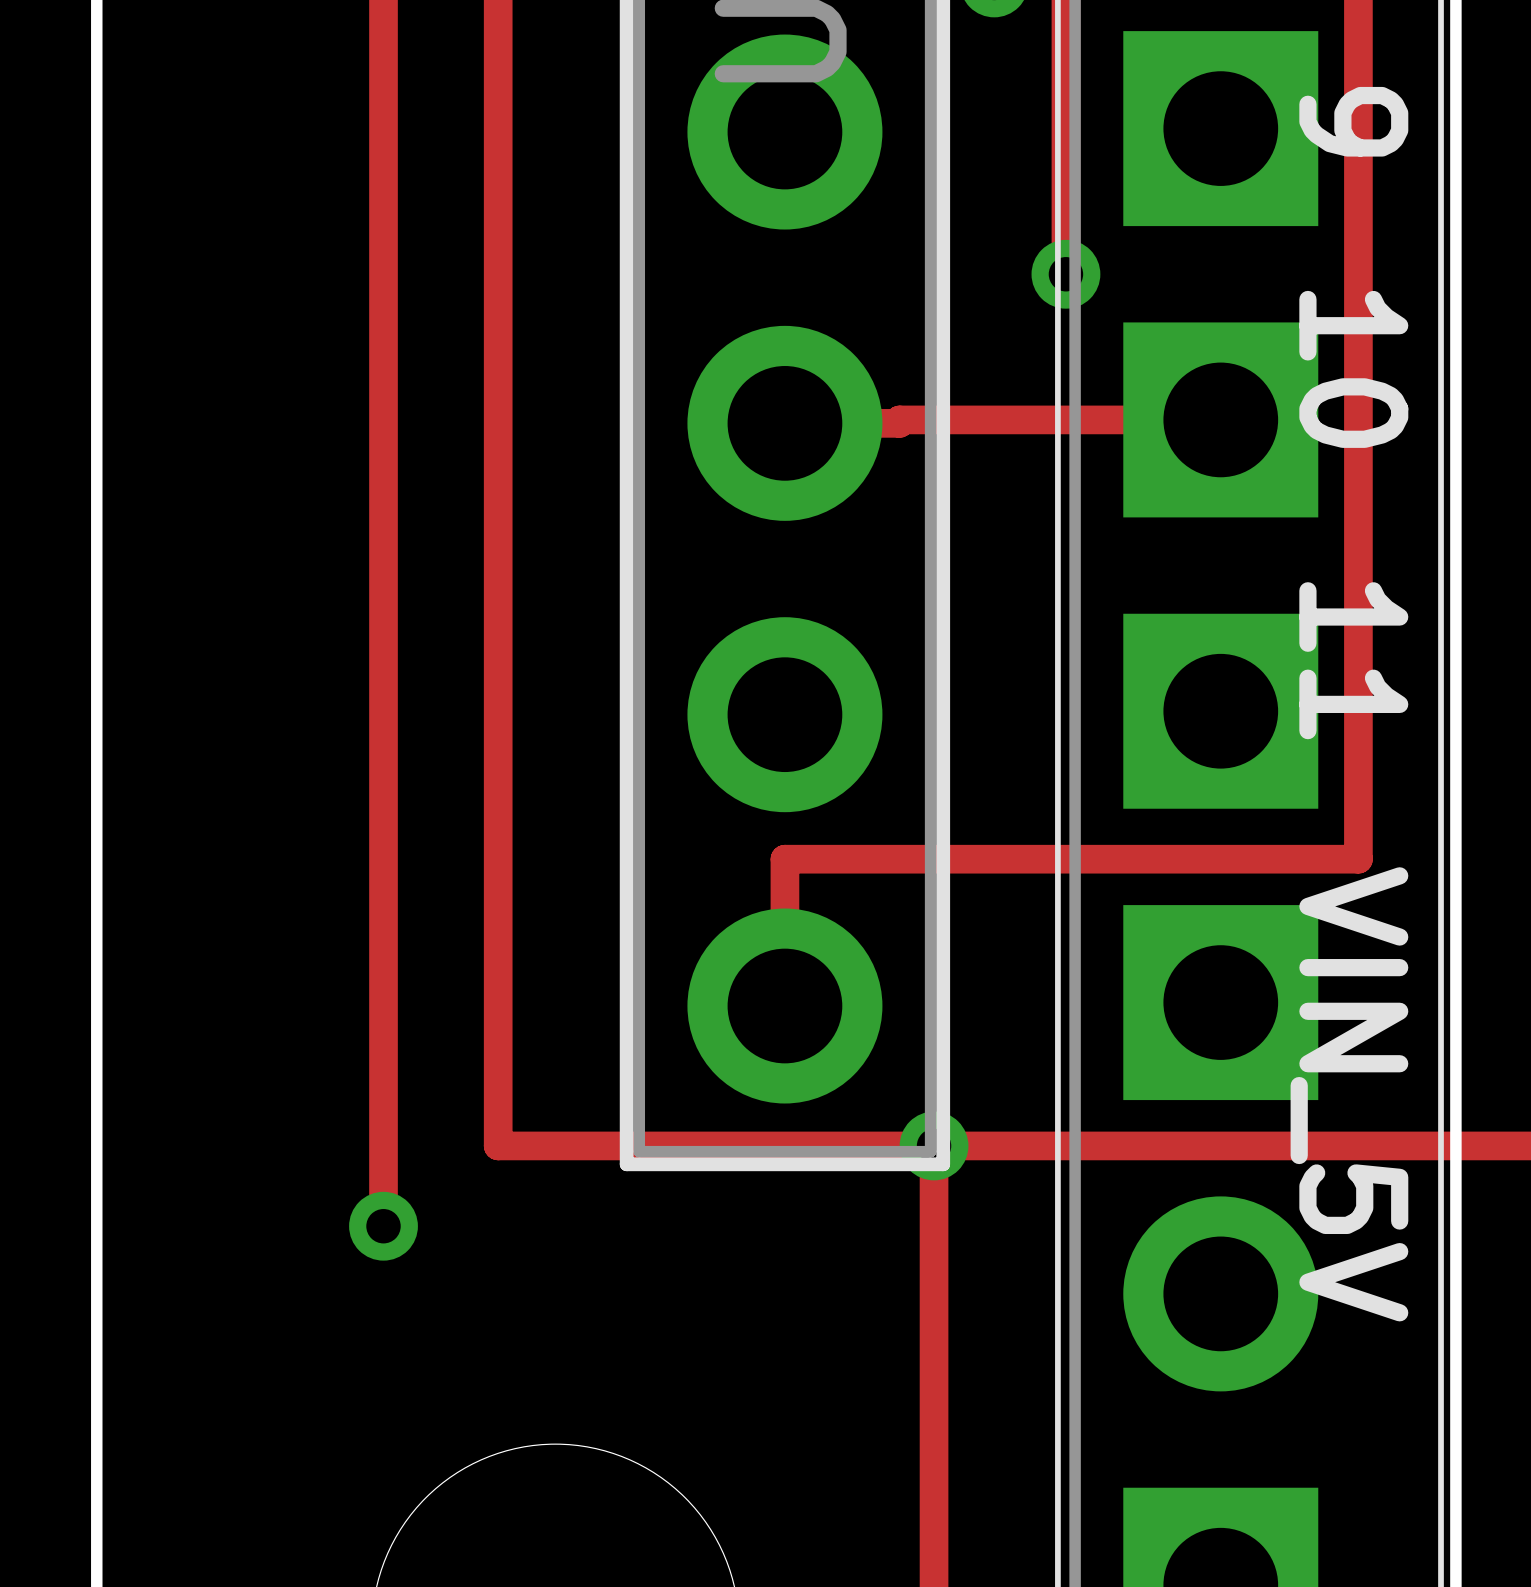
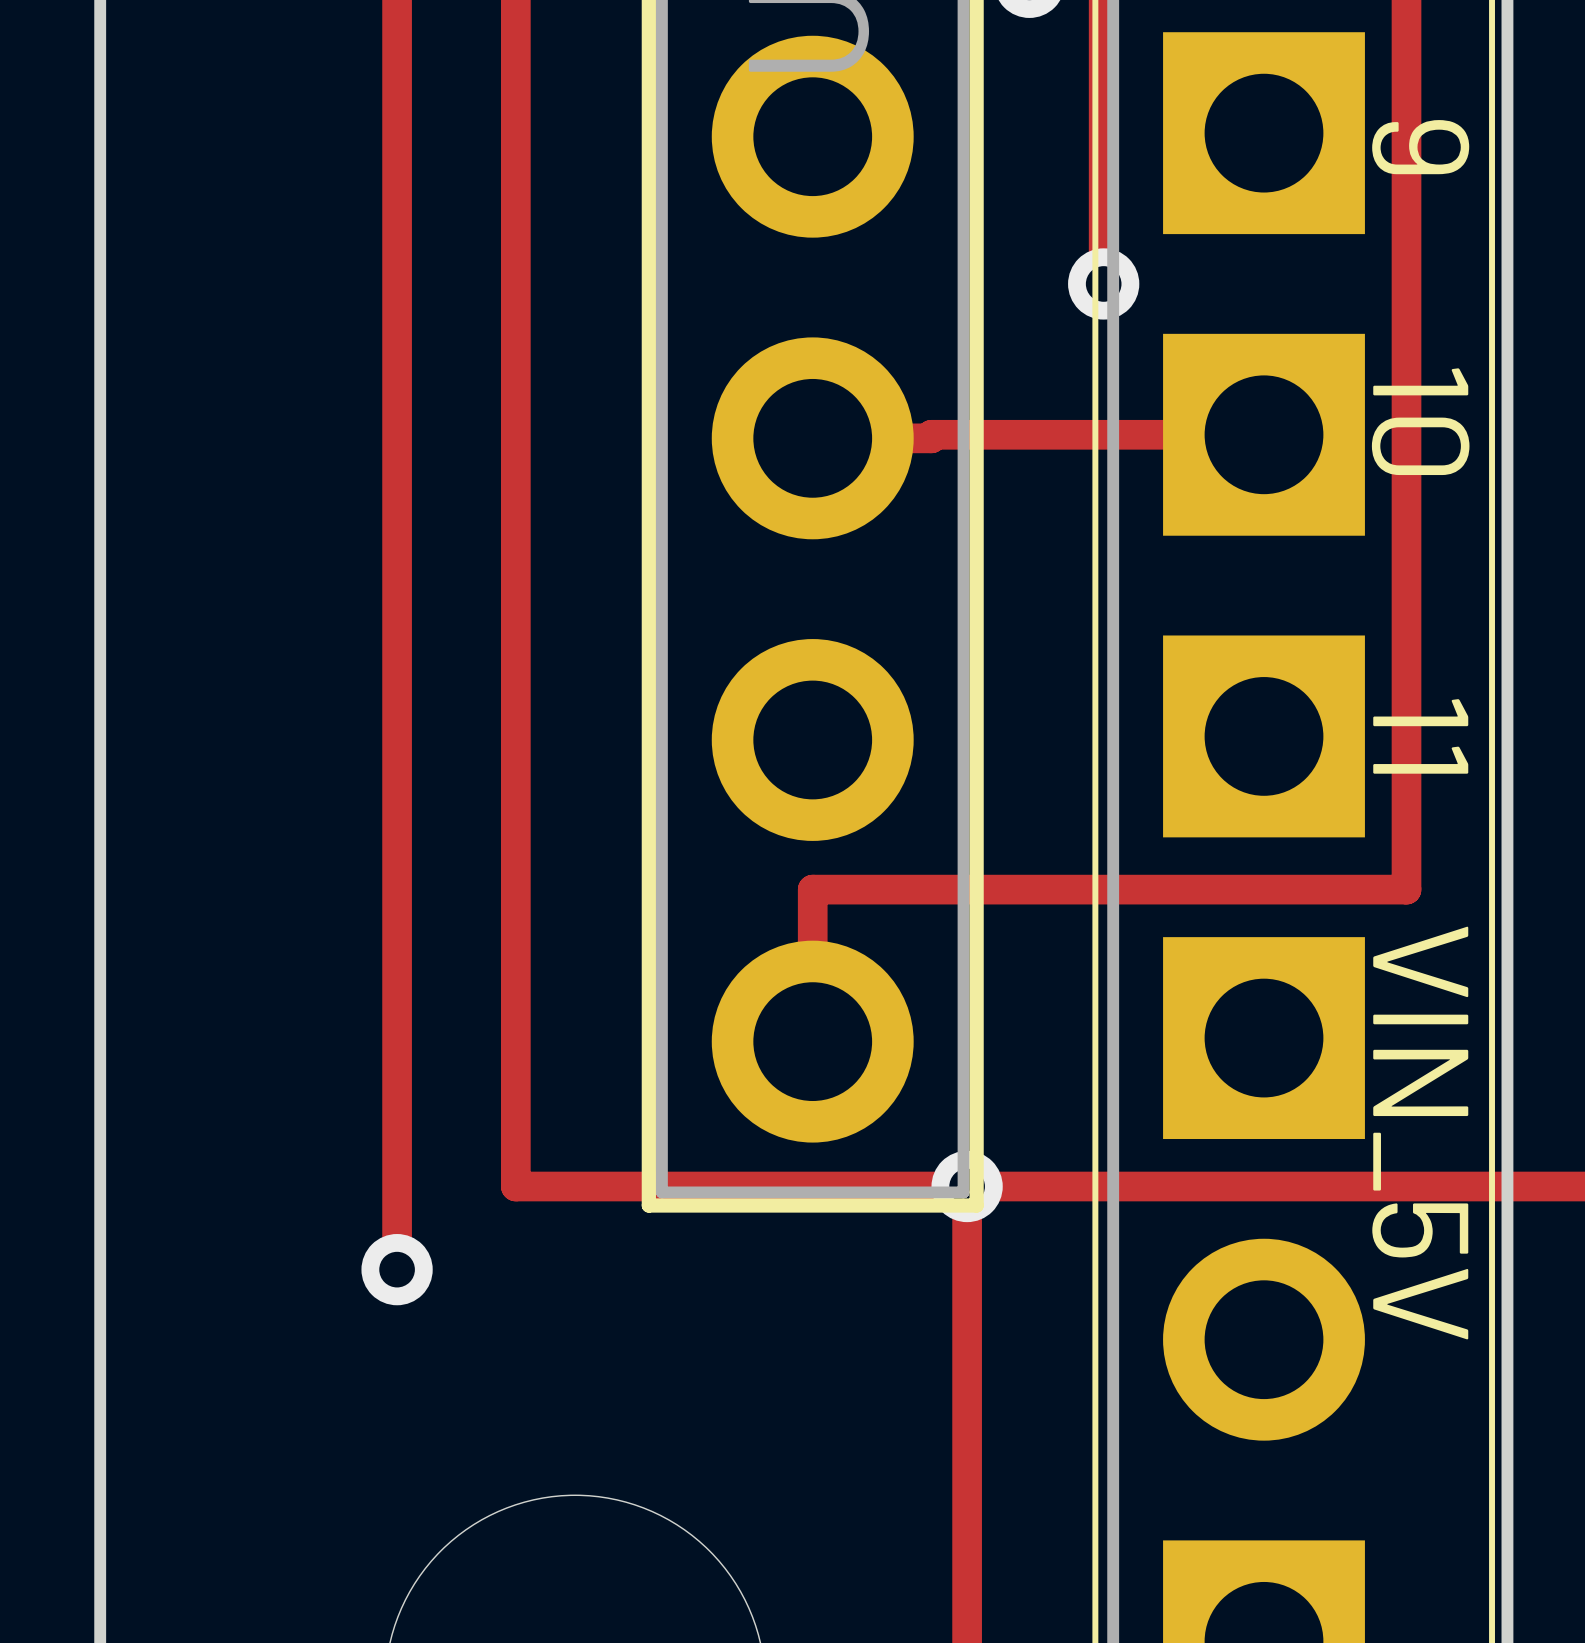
part text position: 9 (1353, 121) -> 9 (1420, 147)
part text position: 10 (1353, 369) -> 10 (1420, 421)
part text position: 11 (1353, 660) -> 11 (1420, 736)
part text position: VIN_5V (1349, 1094) -> VIN_5V (1420, 1133)

